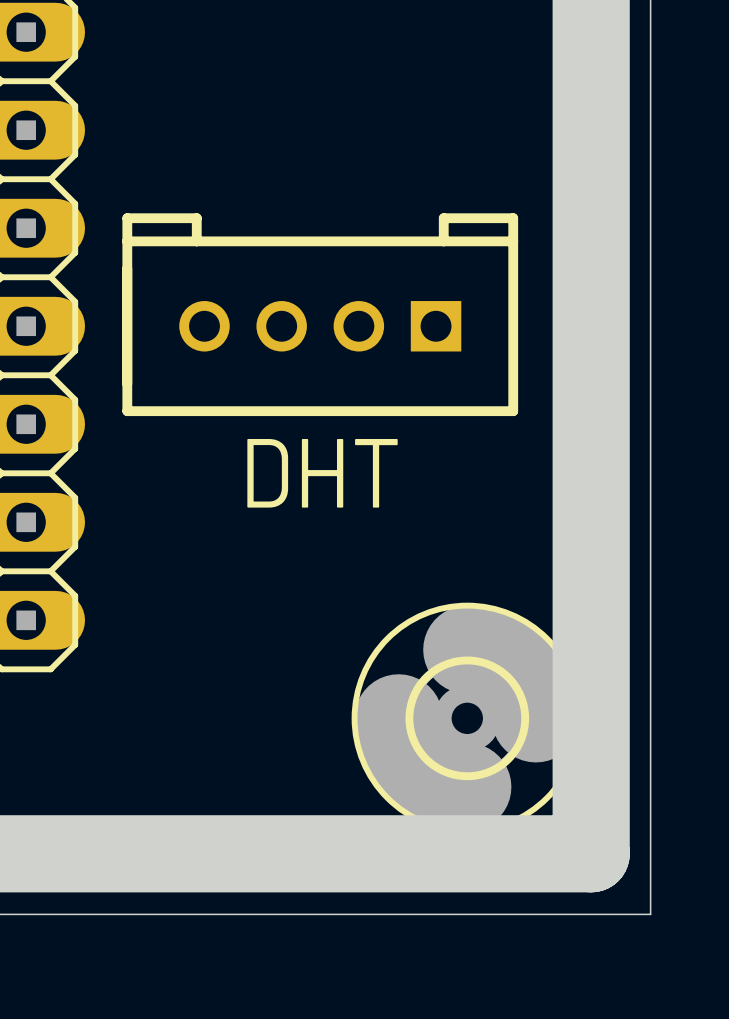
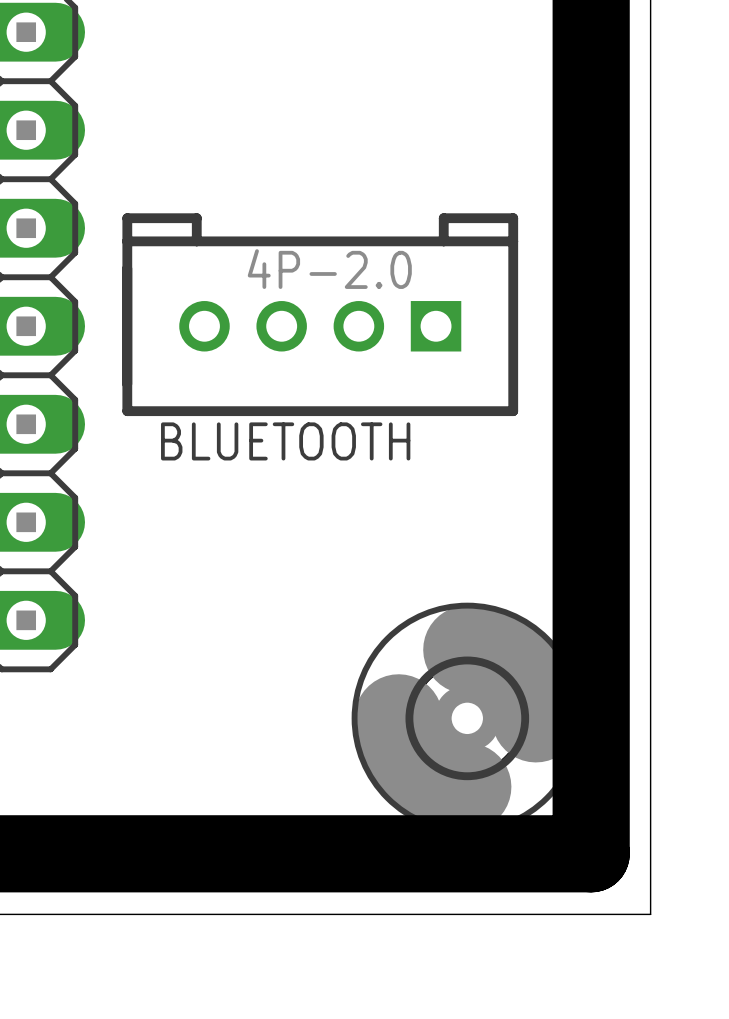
DHT value: none -> 4P-2.0 (329, 269)
DHT name: DHT (322, 473) -> BLUETOOTH (285, 441)

